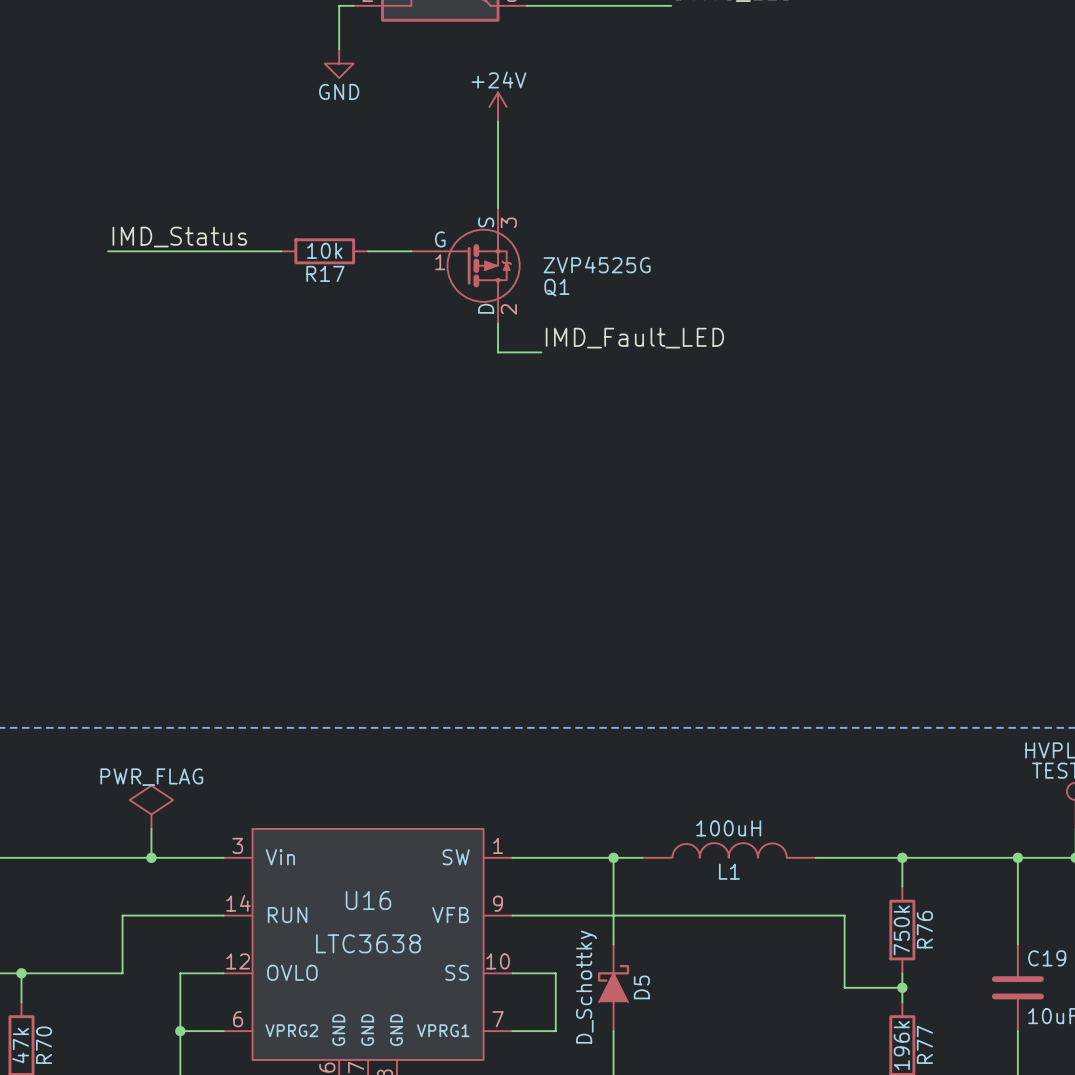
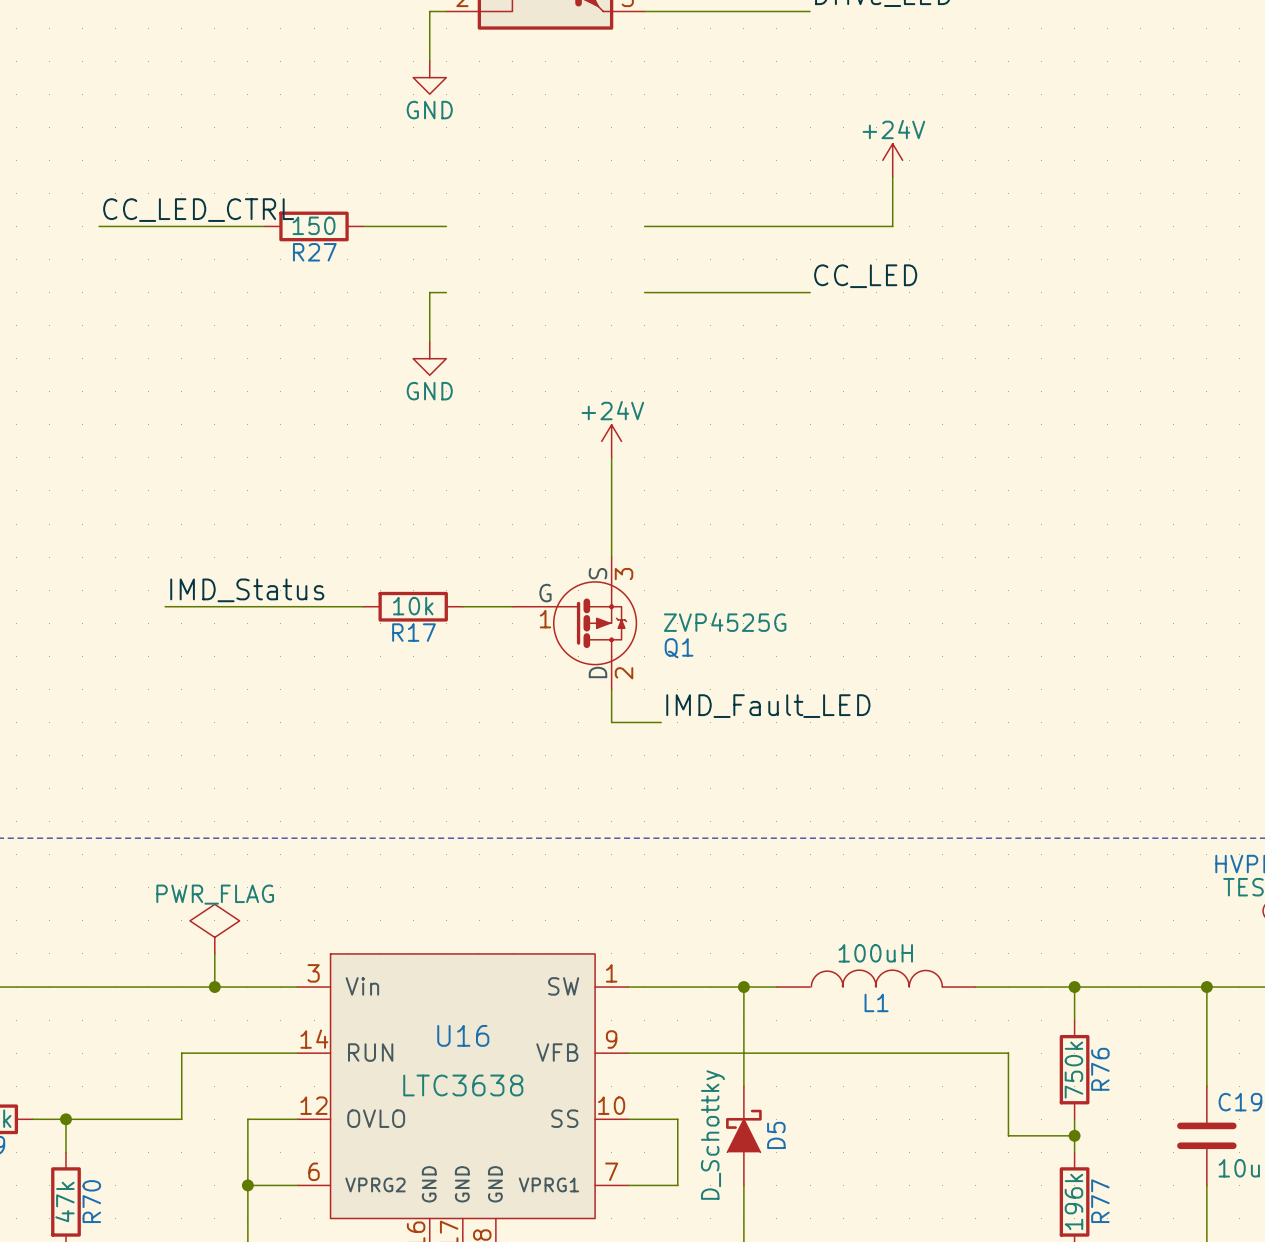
power symbol: +24V (498, 106) -> none
wire: (498, 121) (498, 208) -> (611, 457) (611, 557)
power symbol: none -> +24V (892, 160)
wire: none -> (892, 176) (892, 226) (644, 226)
label: none -> CC_LED_CTRL (198, 210)
wire: none -> (99, 226) (264, 226)
R27: none -> 150 (314, 226)
wire: none -> (363, 226) (446, 226)
label position: IMD_Status (179, 237) -> IMD_Status (247, 590)
label: none -> CC_LED (865, 276)
wire: (108, 251) (281, 251) -> (165, 606) (363, 606)
R17 position: (324, 251) -> (413, 606)
wire: none -> (446, 292) (429, 292) (429, 342)
wire: (368, 251) (411, 251) -> (462, 606) (512, 606)
wire: none -> (644, 292) (810, 292)
Q1 position: (465, 265) -> (574, 623)
power symbol: none -> GND (429, 358)
wire: (498, 323) (498, 352) (541, 352) -> (611, 689) (611, 722) (661, 722)
label position: IMD_Fault_LED (634, 338) -> IMD_Fault_LED (768, 706)
power symbol: none -> +24V (611, 441)

